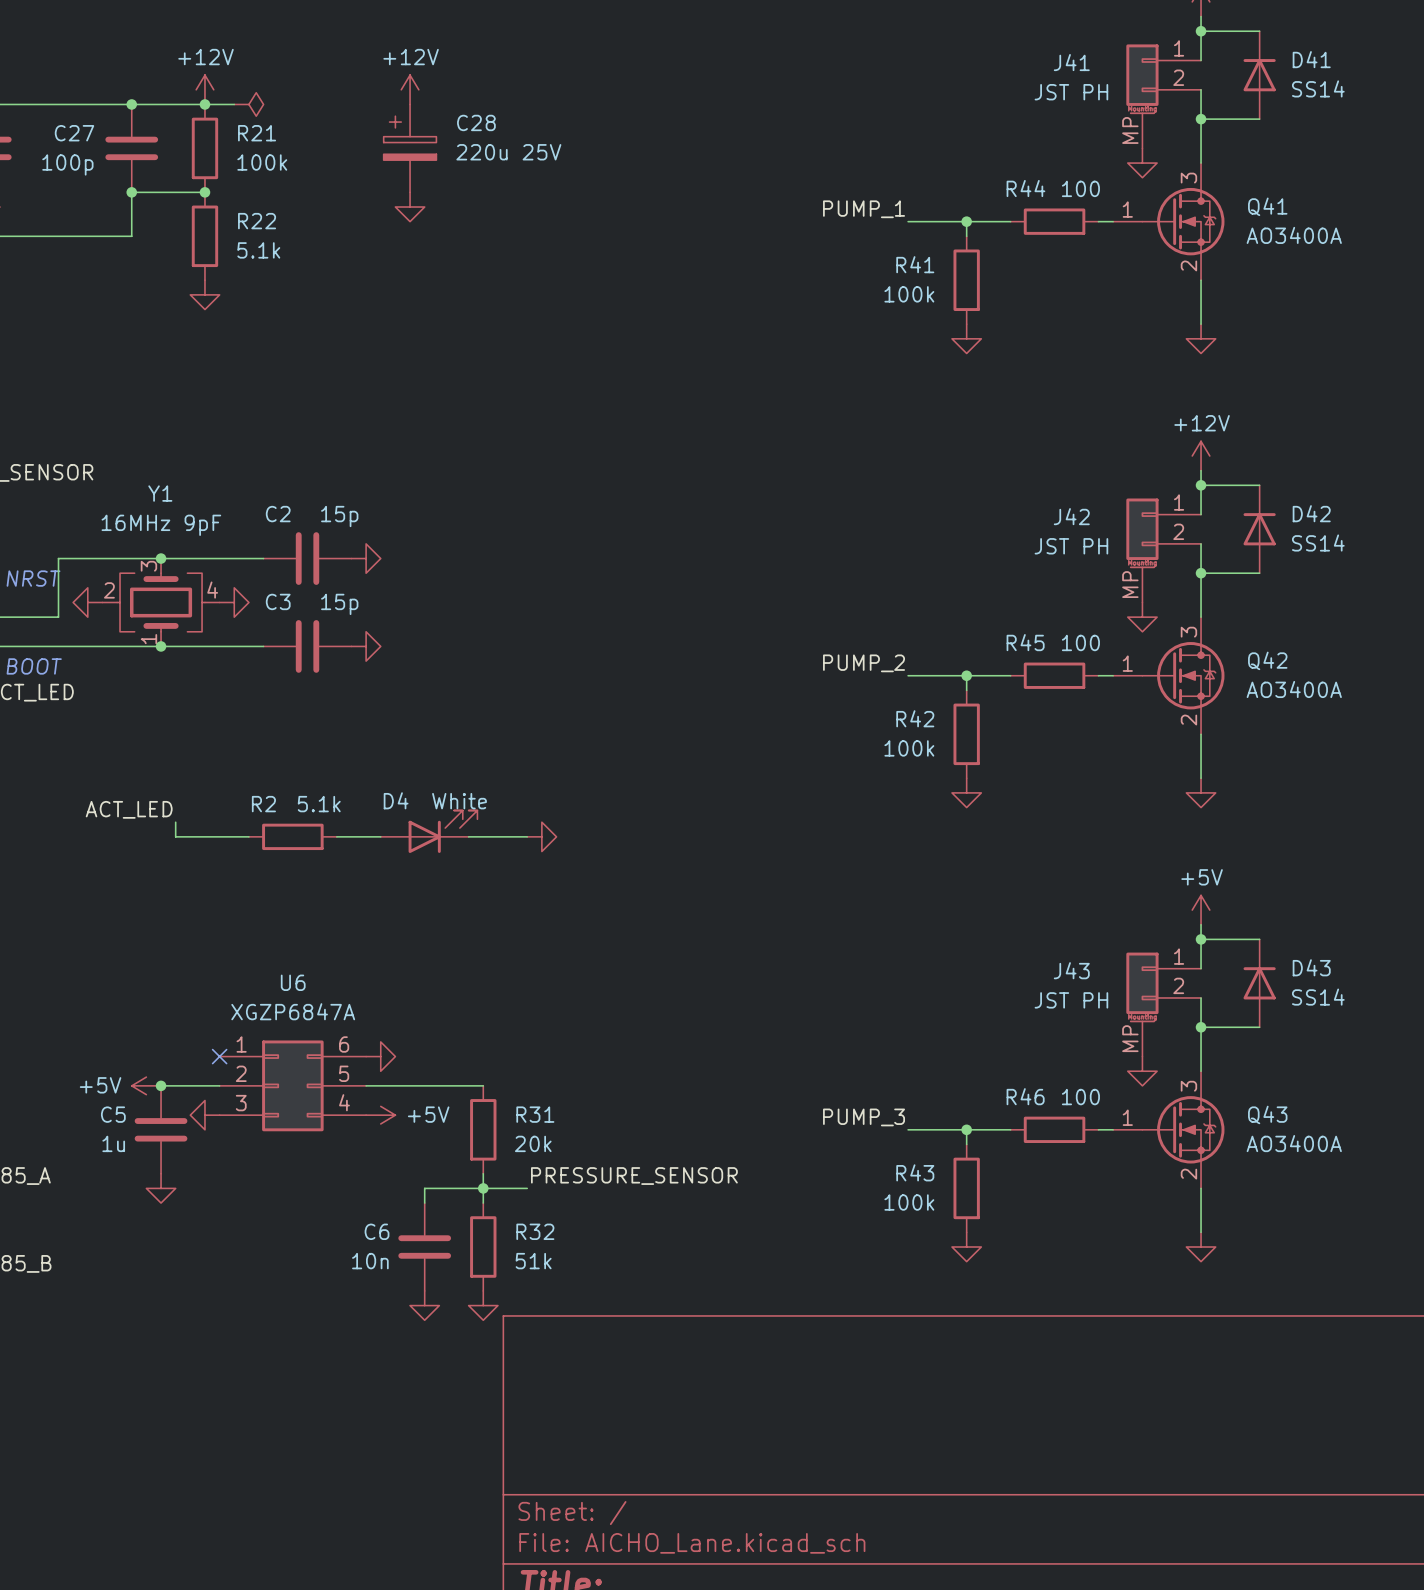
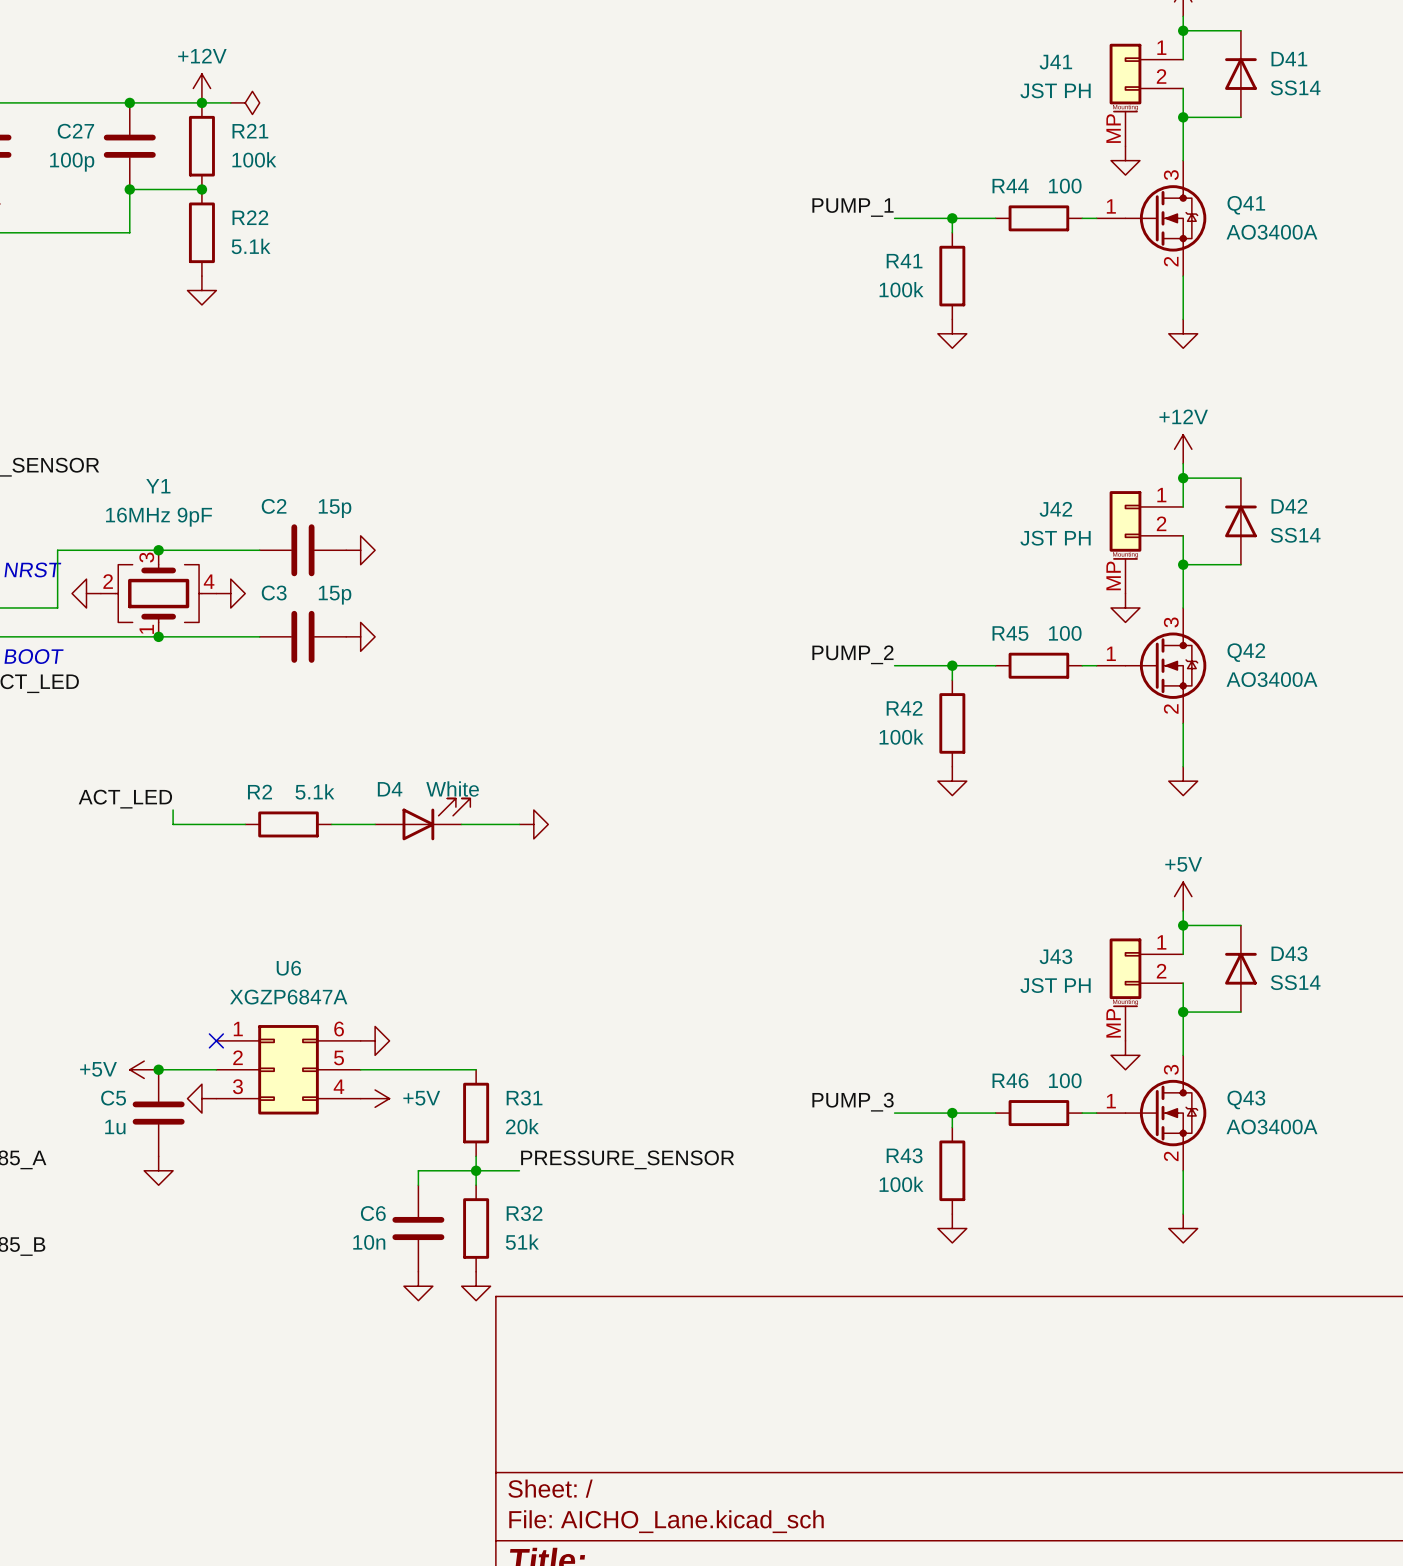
power symbol: +12V (410, 89) -> none
C28: 220u 25V (410, 148) -> none
power symbol: (410, 207) -> none

